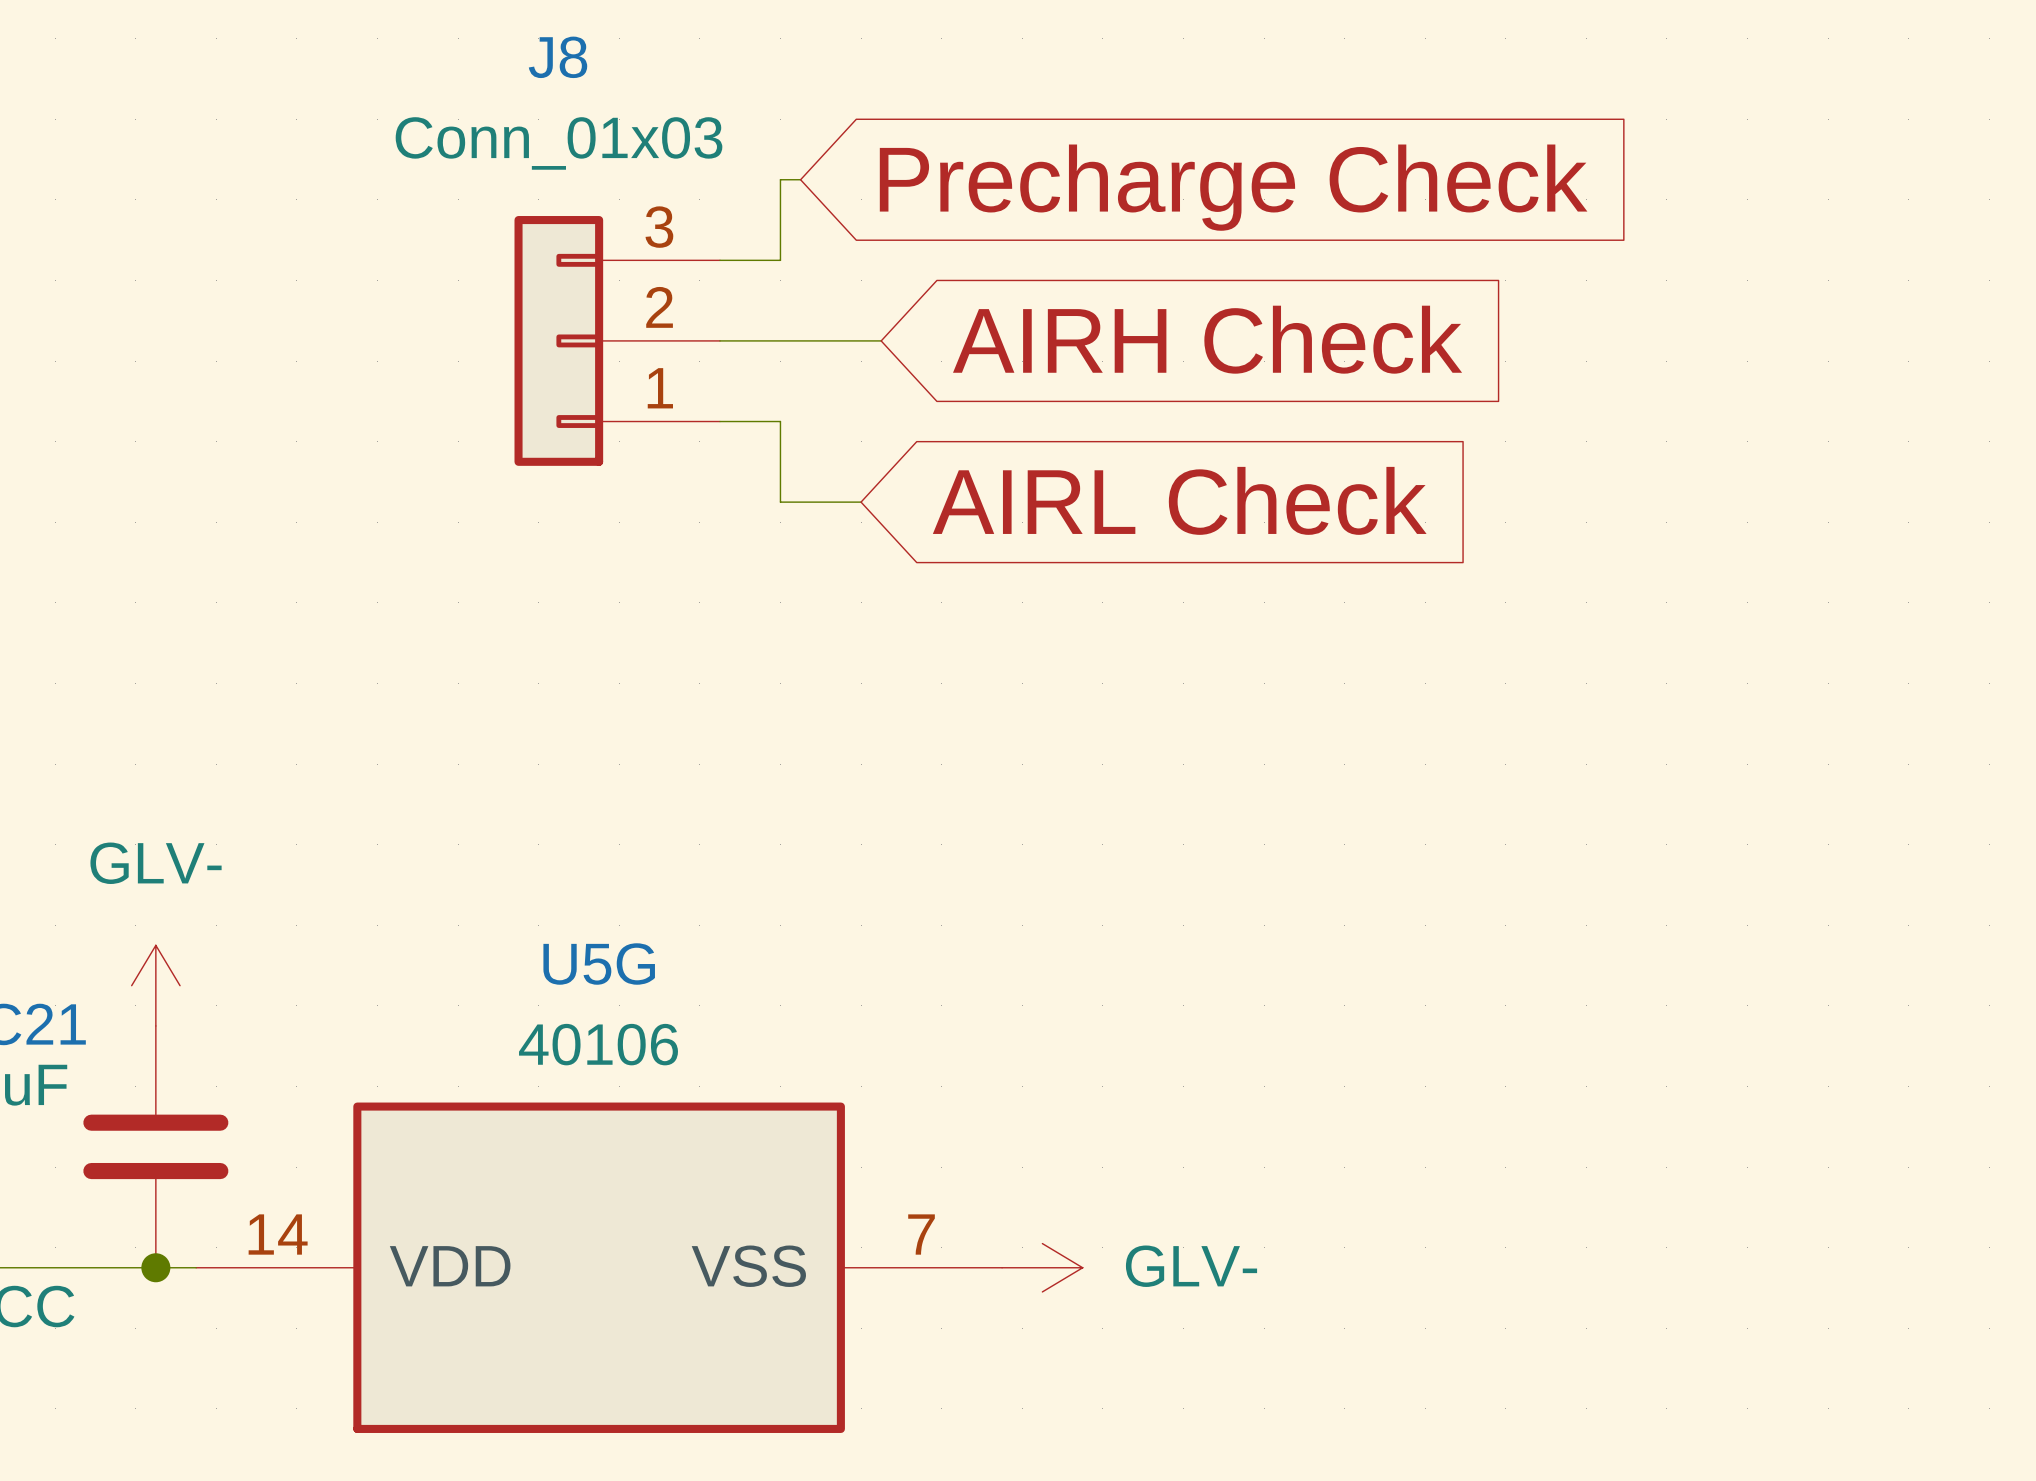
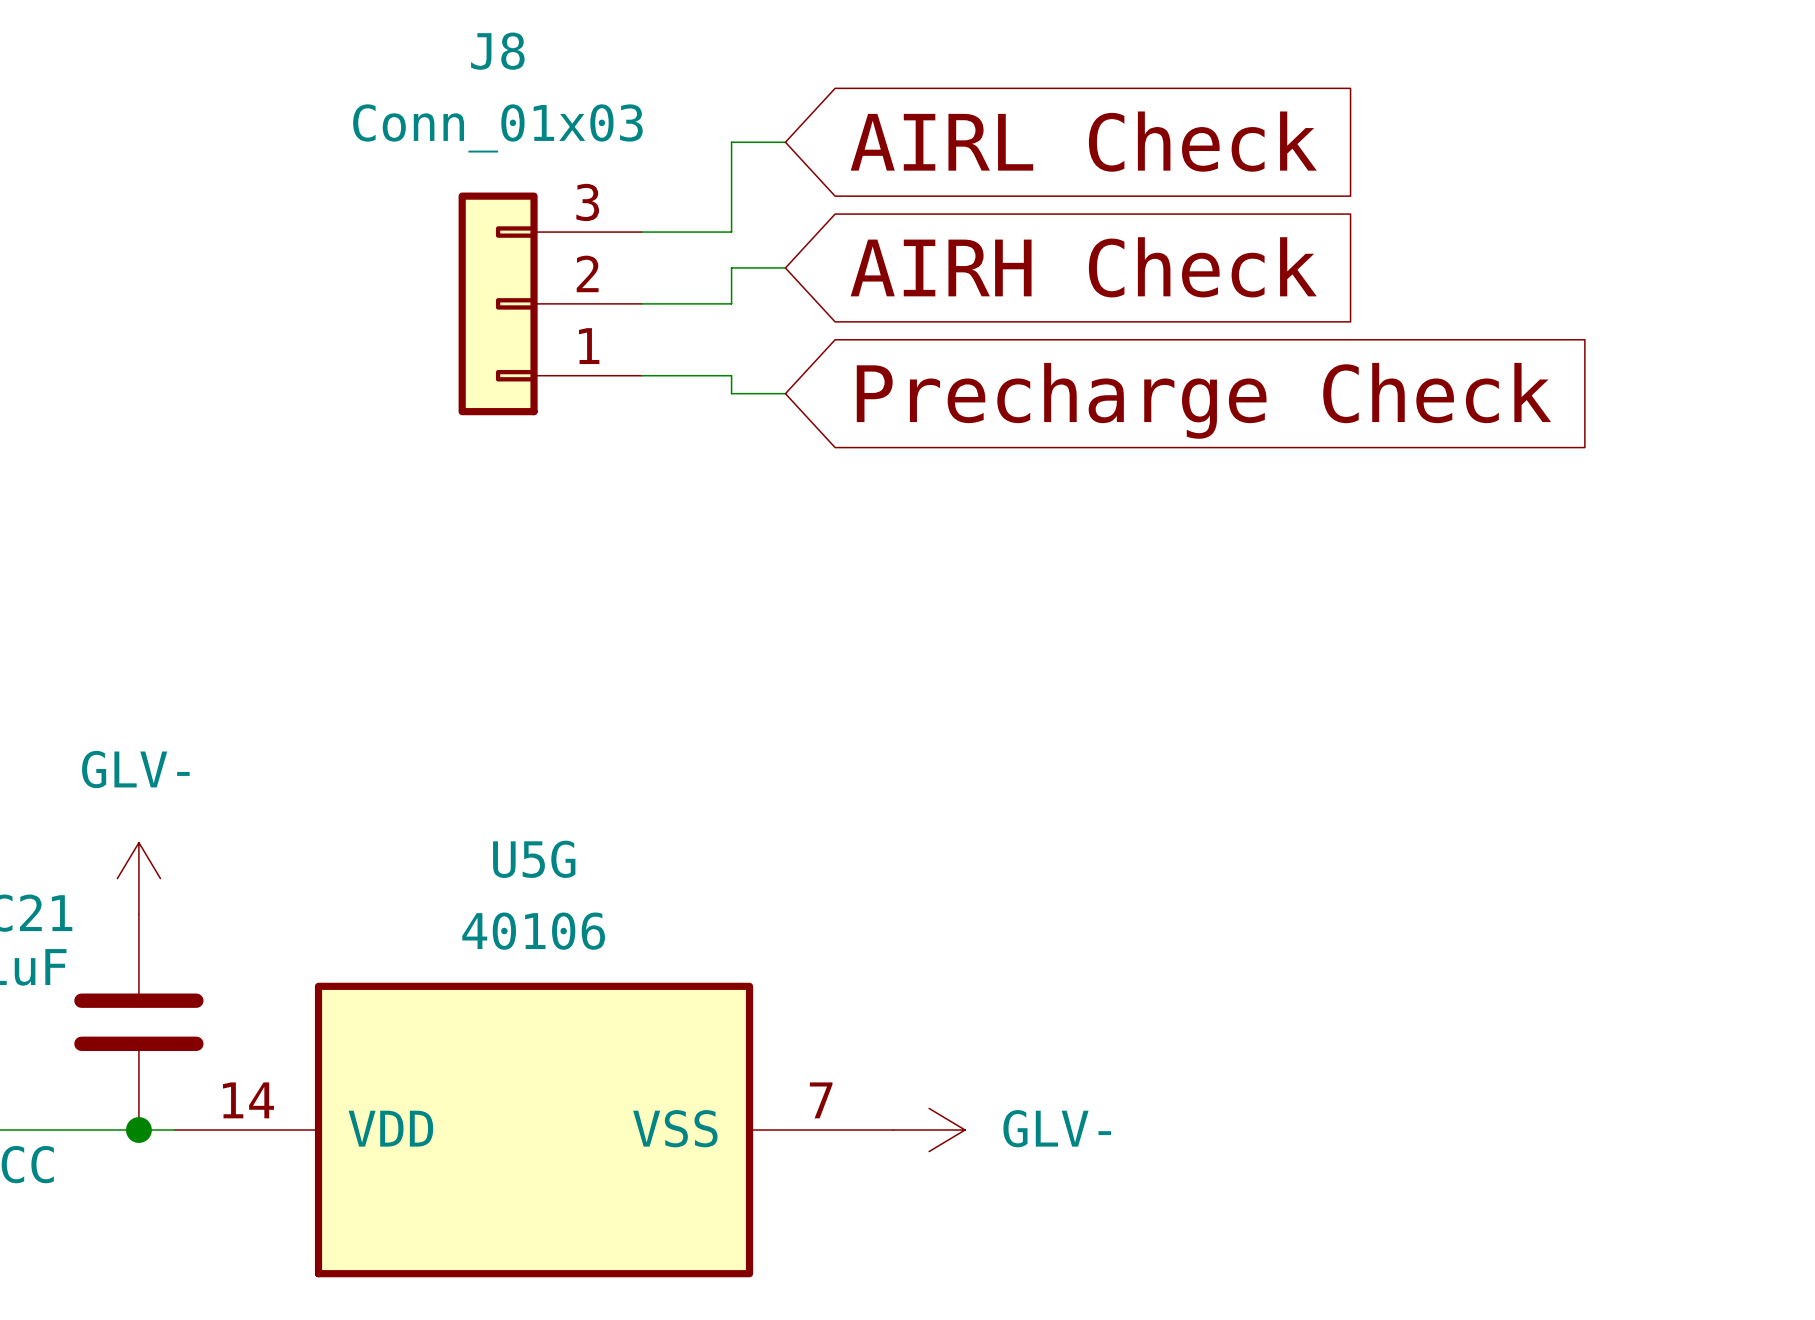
wire: (800, 179) (780, 179) (780, 260) -> (785, 142) (731, 142) (731, 232) (695, 232)
global label position: Precharge Check (1233, 187) -> Precharge Check (1203, 400)
global label position: AIRH Check (1207, 339) -> AIRH Check (1083, 267)
wire: (820, 340) (881, 340) -> (731, 303) (731, 267) (785, 267)
wire: (780, 421) (780, 502) (861, 502) -> (695, 375) (731, 375) (731, 393) (785, 393)
global label position: AIRL Check (1179, 500) -> AIRL Check (1083, 141)

